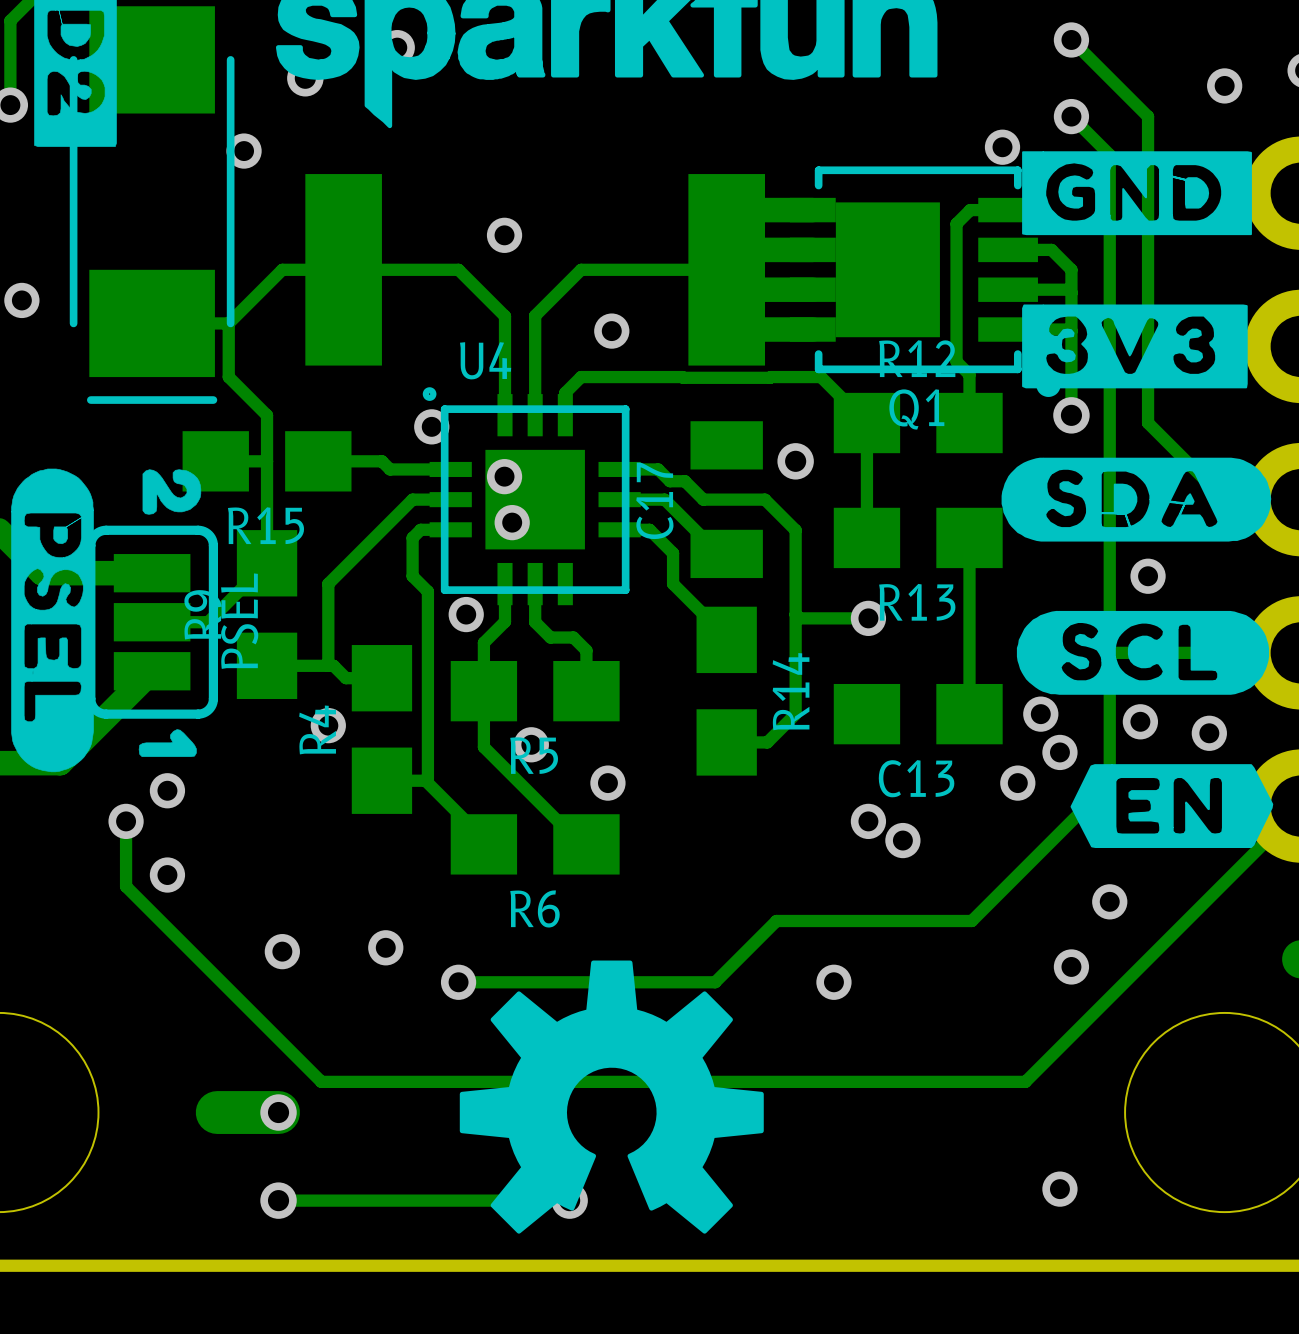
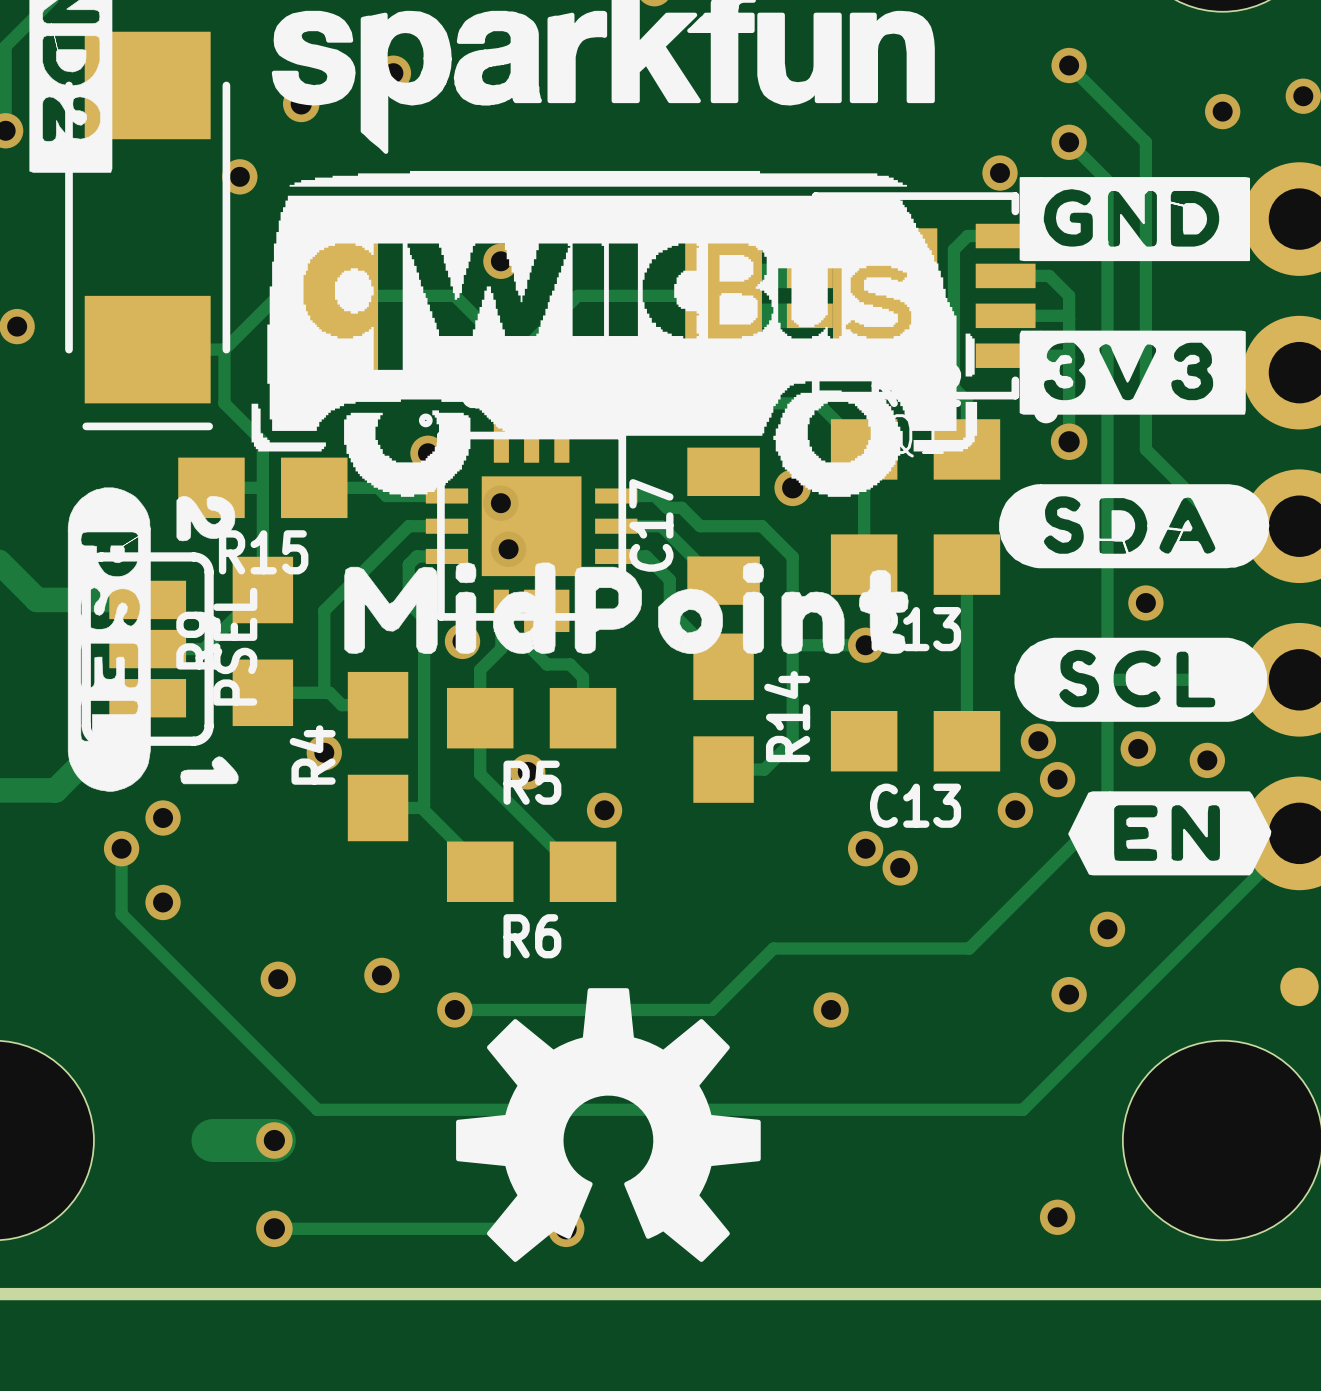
drawing: none -> [251, 170, 978, 654]
drawing position: (171, 492) -> (205, 518)
drawing position: (52, 620) -> (109, 639)
drawing position: (167, 743) -> (209, 770)

